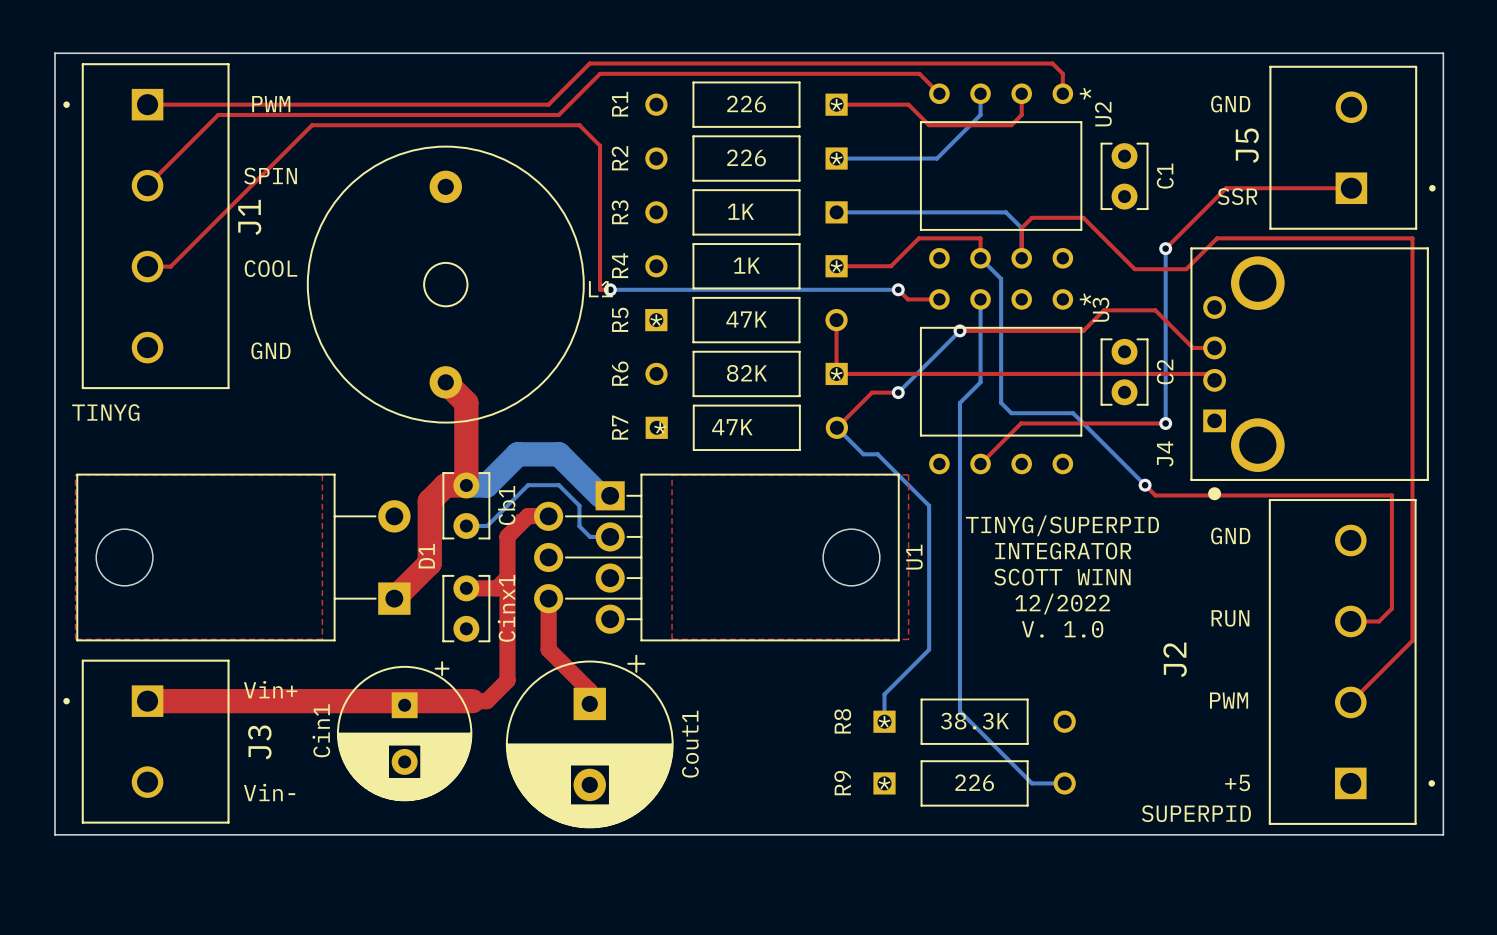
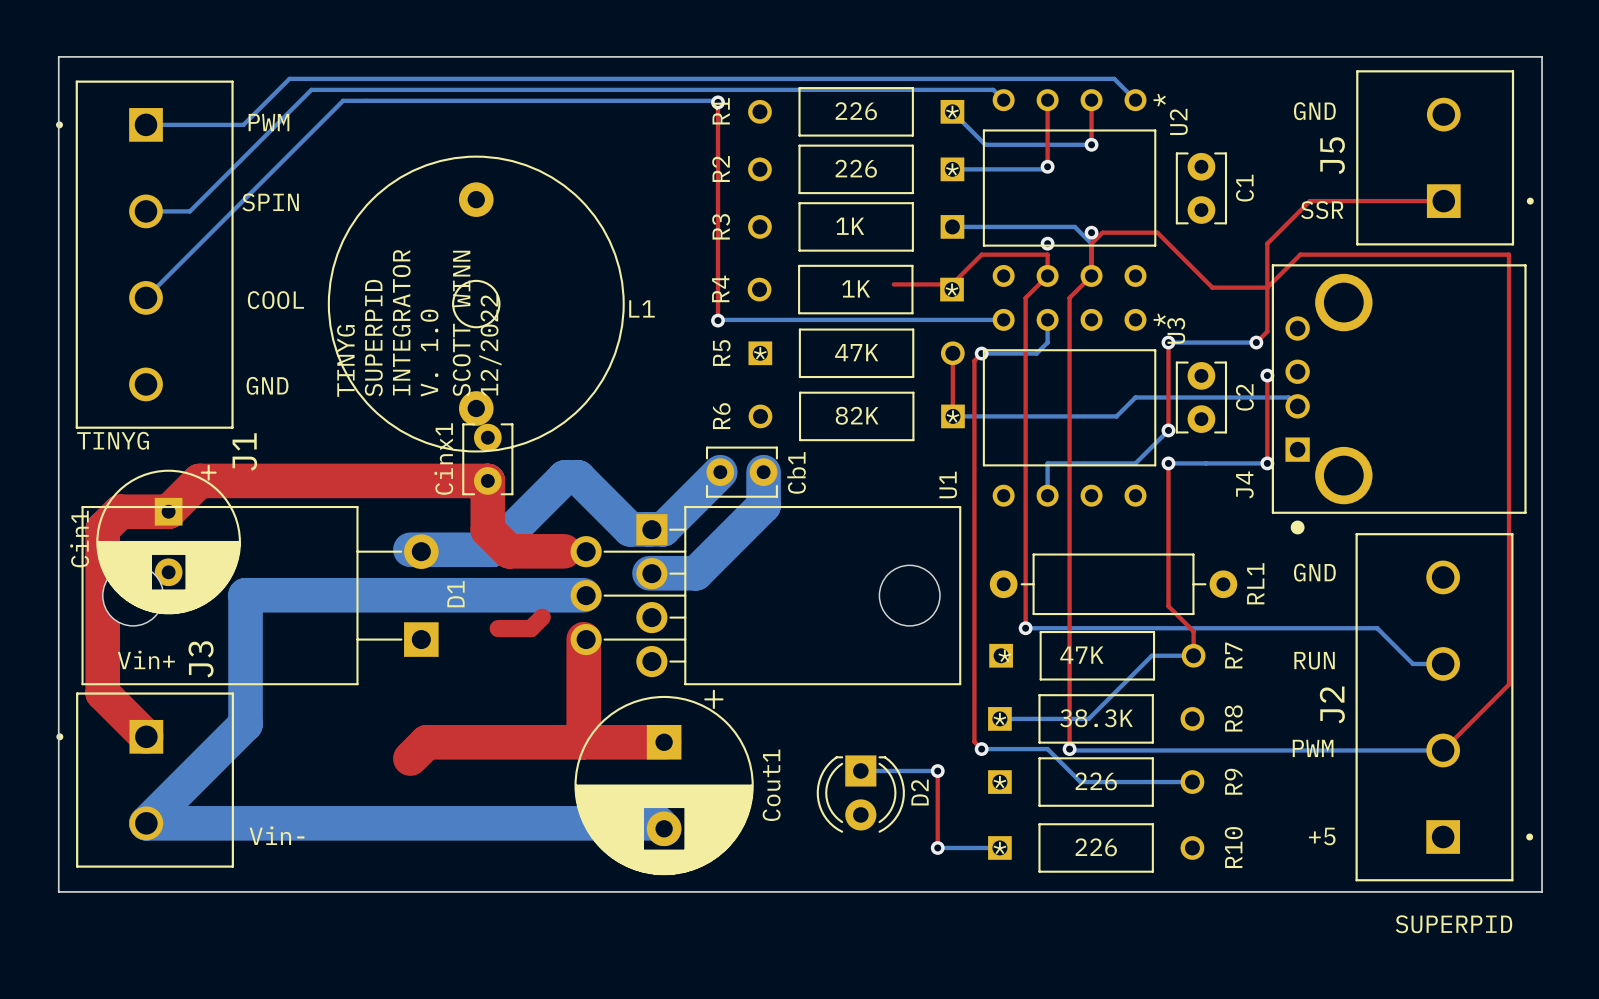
top track: (939, 93) (919, 73) (600, 73) (558, 114) (218, 114) (147, 185) -> none
bottom track: none -> (1003, 100) (993, 89) (311, 89) (189, 211) (146, 211)
top track: none -> (1047, 100) (1047, 166)
bottom track: (980, 93) (980, 114) (936, 158) -> (1047, 166) (1045, 169) (1001, 169)
top track: (1062, 93) (1062, 73) (1052, 63) (589, 63) (548, 104) (147, 104) -> none
bottom track: none -> (1135, 100) (1114, 78) (289, 78) (243, 124) (146, 124)
top track: none -> (717, 102) (717, 320)
bottom track: none -> (717, 102) (716, 100) (343, 100) (146, 297)
via: none -> (717, 102)
text position: PWM (271, 104) -> PWM (268, 122)
R1 position: (746, 104) -> (856, 111)
top track: (836, 104) (908, 104) (929, 125) (1011, 125) (1021, 114) -> (1091, 144) (1091, 122)
bottom track: none -> (952, 111) (985, 144) (1091, 144)
via: none -> (1091, 144)
via: none -> (1047, 166)
R2 position: (746, 158) -> (856, 169)
bottom track: (836, 158) (891, 158) -> none
text position: SPIN (270, 176) -> SPIN (270, 202)
R3 position: (746, 212) -> (856, 226)
bottom track: (836, 212) (891, 212) -> none
J1 name position: J1 (249, 217) -> J1 (244, 451)
via: none -> (1091, 232)
J1 position: (146, 226) -> (144, 254)
via: none -> (1047, 243)
top track: (1186, 228) (1165, 248) -> (1267, 243) (1267, 331) (1256, 342)
bottom track: (1165, 248) (1165, 423) -> none
via: (1165, 248) -> none
top track: none -> (1047, 275) (1025, 297) (1025, 628)
bottom track: (980, 258) (1001, 278) (1001, 402) (1011, 413) (1073, 413) (1145, 485) -> none
top track: none -> (1091, 275) (1069, 297) (1069, 749)
top track: (147, 266) (170, 266) (312, 125) (579, 125) (600, 145) (600, 289) (610, 289) -> none
R4 position: (746, 266) -> (855, 289)
text position: COOL (271, 268) -> COOL (275, 300)
bottom track: (610, 289) (898, 289) -> none
via position: (610, 289) -> (717, 320)
top track: (898, 289) (907, 299) (939, 299) -> none
via: (898, 289) -> none
bottom track: none -> (1003, 319) (717, 320)
text: none -> INTEGRATOR (401, 322)
text: none -> SCOTT WINN (461, 323)
text: none -> SUPERPID (373, 338)
R5 position: (746, 320) -> (856, 353)
top track: (836, 320) (836, 373) -> none
bottom track: (980, 320) (980, 382) (959, 402) (959, 711) (1031, 783) (1064, 783) -> (1047, 342) (1036, 353) (981, 353)
top track: none -> (1168, 342) (1168, 430)
bottom track: none -> (1168, 342) (1256, 342)
via: none -> (1168, 342)
via: none -> (1256, 342)
text: none -> 12/2022 (490, 345)
text: none -> V. 1.0 (429, 353)
top track: none -> (952, 353) (952, 416)
top track: none -> (981, 353) (974, 360) (974, 741) (981, 749)
via: none -> (981, 353)
top track: (959, 330) (1083, 330) (1103, 310) (1155, 310) (1193, 347) (1214, 347) -> none
bottom track: (959, 330) (898, 392) -> none
via: (959, 330) -> none
text: none -> TINYG (345, 360)
text position: GND (270, 350) -> GND (267, 385)
top track: none -> (1267, 375) (1267, 463)
via: none -> (1267, 375)
R6 position: (746, 373) -> (856, 416)
top track: (836, 373) (1208, 373) -> none
bottom track: none -> (1297, 406) (1288, 397) (1135, 397) (1116, 416) (952, 416)
top track: (445, 382) (466, 402) (466, 485) (445, 485) (429, 501) (429, 563) (394, 598) -> none
top track: (898, 392) (872, 392) (836, 427) -> none
via: (898, 392) -> none
bottom track: none -> (1168, 430) (1135, 463) (1047, 463) (1047, 495)
via: none -> (1168, 430)
top track: (1165, 423) (1021, 423) (980, 463) -> none
via position: (1165, 423) -> (1267, 463)
R7 name position: R7 (620, 427) -> R7 (1233, 655)
R7 position: (746, 427) -> (1097, 655)
bottom track: (836, 427) (863, 454) (877, 454) (929, 505) (929, 649) (884, 694) (884, 721) -> none
top track: none -> (1168, 463) (1168, 606) (1193, 631) (1193, 655)
bottom track: none -> (1168, 463) (1267, 463)
via: none -> (1168, 463)
bottom track: none -> (720, 472) (663, 529) (630, 529) (578, 477) (564, 477) (492, 549) (410, 549)
bottom track: none -> (763, 472) (763, 505) (696, 573) (649, 573)
top track: none -> (487, 480) (199, 480) (168, 511) (120, 511) (102, 529) (102, 693) (146, 736)
top zone outline: (75, 474) (322, 474) (322, 639) (75, 639) (75, 474) -> none
top zone outline: (672, 474) (672, 639) (908, 639) (908, 474) (672, 474) -> none
bottom track: (466, 485) (486, 485) (517, 454) (558, 454) (600, 495) (610, 495) -> none
top track: (1145, 485) (1155, 495) (1391, 495) (1391, 608) (1379, 621) (1350, 621) -> none
via: (1145, 485) -> none
Cb1 rotation: 0° (466, 505) -> 90° clockwise (741, 472)
Cb1 position: (466, 505) -> (741, 472)
top track: (528, 516) (507, 536) (507, 680) (486, 701) (147, 701) -> (564, 551) (509, 551) (487, 529) (487, 480)
text: TINYG/SUPERPID (1062, 525) -> none
bottom track: (466, 526) (487, 526) (528, 485) (558, 485) (579, 505) (579, 526) (590, 536) (610, 536) -> none
RL1: none -> (1113, 584)
text: INTEGRATOR (1063, 551) -> none
bottom track: none -> (583, 595) (245, 595) (245, 724) (146, 823) (658, 823) (664, 828)
U1 name position: U1 (914, 557) -> U1 (948, 484)
text: SCOTT WINN (1062, 577) -> none
bottom track: none -> (1025, 628) (1377, 628) (1412, 663) (1443, 663)
via: none -> (1025, 628)
top track: none -> (583, 639) (583, 740) (581, 742)
top track: (548, 598) (548, 649) (589, 690) (589, 703) -> none
text: 12/2022 (1062, 604) -> none
Cinx1 position: (466, 608) -> (487, 459)
Cinx1 name position: Cinx1 (506, 608) -> Cinx1 (443, 459)
bottom track: none -> (1193, 655) (1151, 655) (1088, 718) (999, 718)
text: V. 1.0 (1062, 629) -> none
J2 name position: J2 (1175, 659) -> J2 (1332, 704)
text position: Vin+ (270, 689) -> Vin+ (146, 659)
top track: none -> (664, 742) (426, 742) (410, 758)
bottom track: none -> (981, 749) (1047, 749) (1080, 782) (1192, 782)
via: none -> (981, 749)
bottom track: none -> (1069, 749) (1443, 750)
via: none -> (1069, 749)
bottom track: none -> (860, 770) (937, 770)
R8 name position: R8 (842, 721) -> R8 (1233, 718)
top track: none -> (937, 771) (937, 847)
via: none -> (937, 771)
R8 position: (974, 721) -> (1096, 718)
Cin1 position: (404, 731) -> (168, 539)
J3 position: (146, 741) -> (145, 780)
Cout1 position: (589, 741) -> (664, 782)
J3 name position: J3 (259, 742) -> J3 (201, 659)
D2: none -> (860, 794)
R9 name position: R9 (842, 783) -> R9 (1233, 781)
R9 position: (974, 783) -> (1096, 782)
text position: Vin- (269, 792) -> Vin- (277, 835)
bottom track: none -> (937, 847) (999, 847)
via: none -> (937, 847)
R10: none -> 226 (1096, 847)
text position: SUPERPID (1196, 813) -> SUPERPID (1453, 924)

